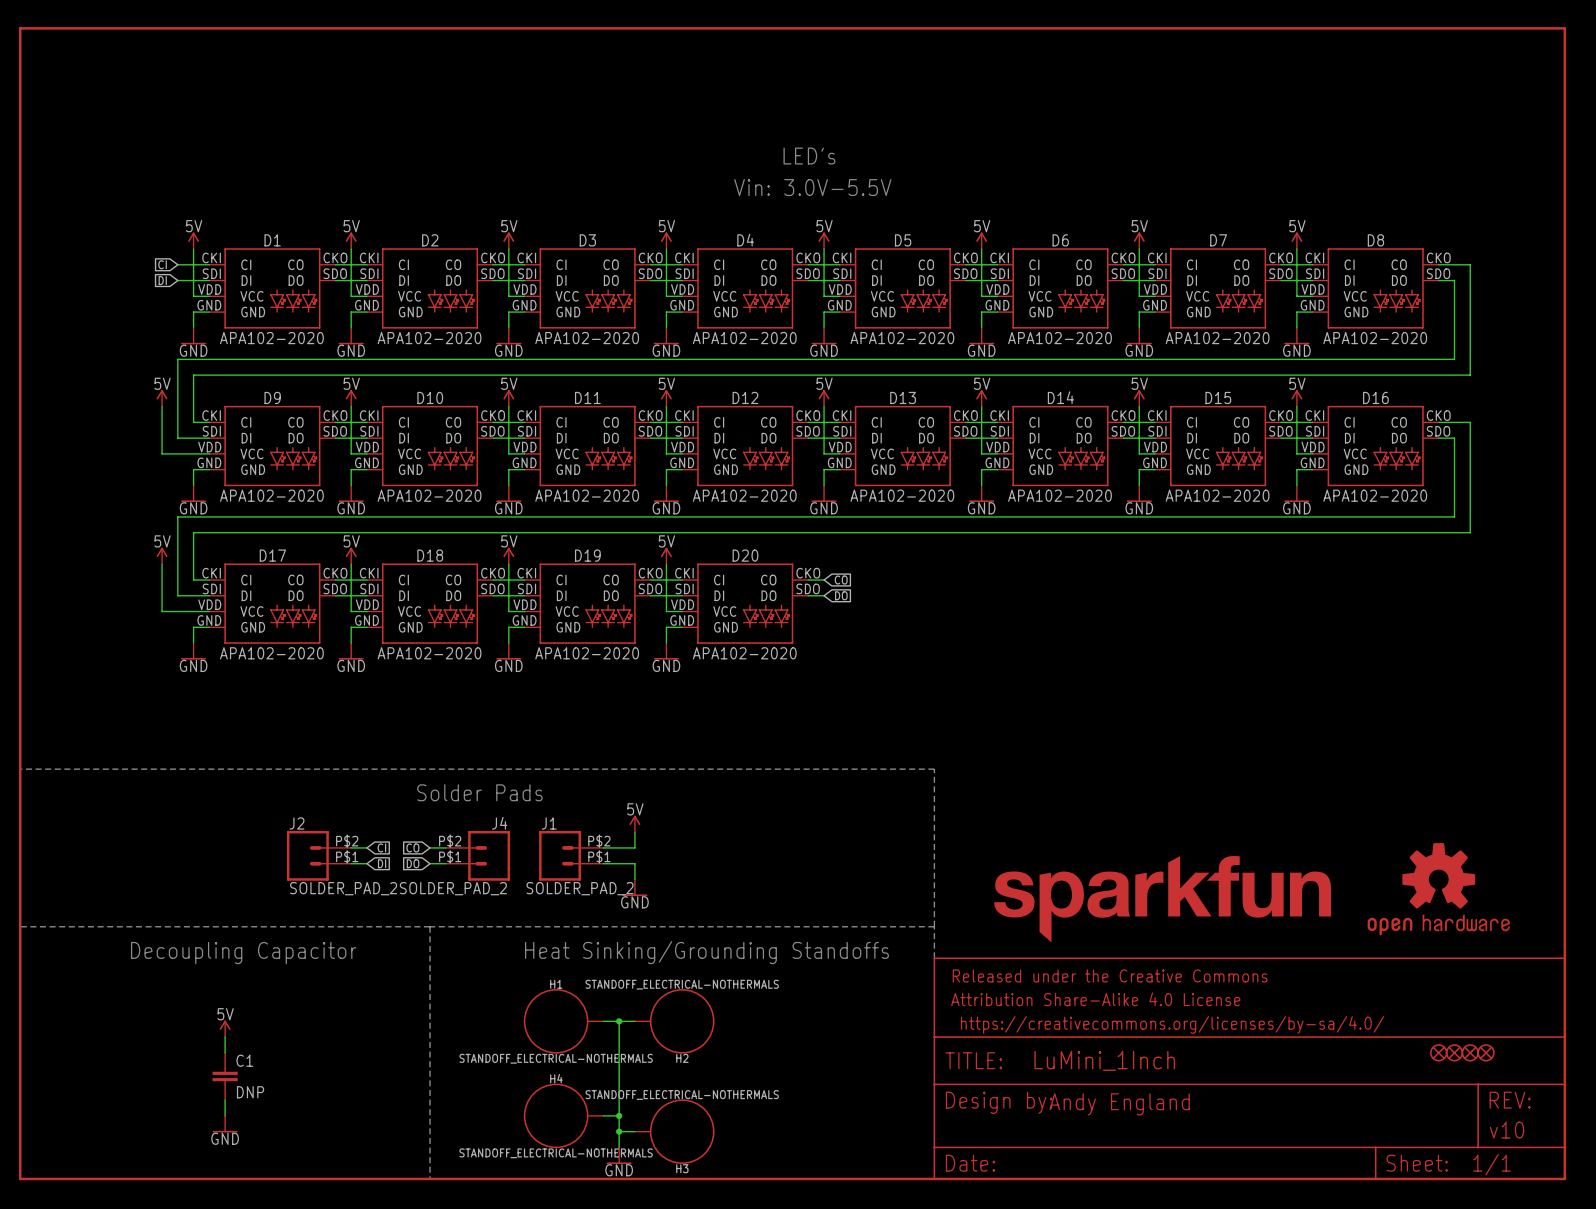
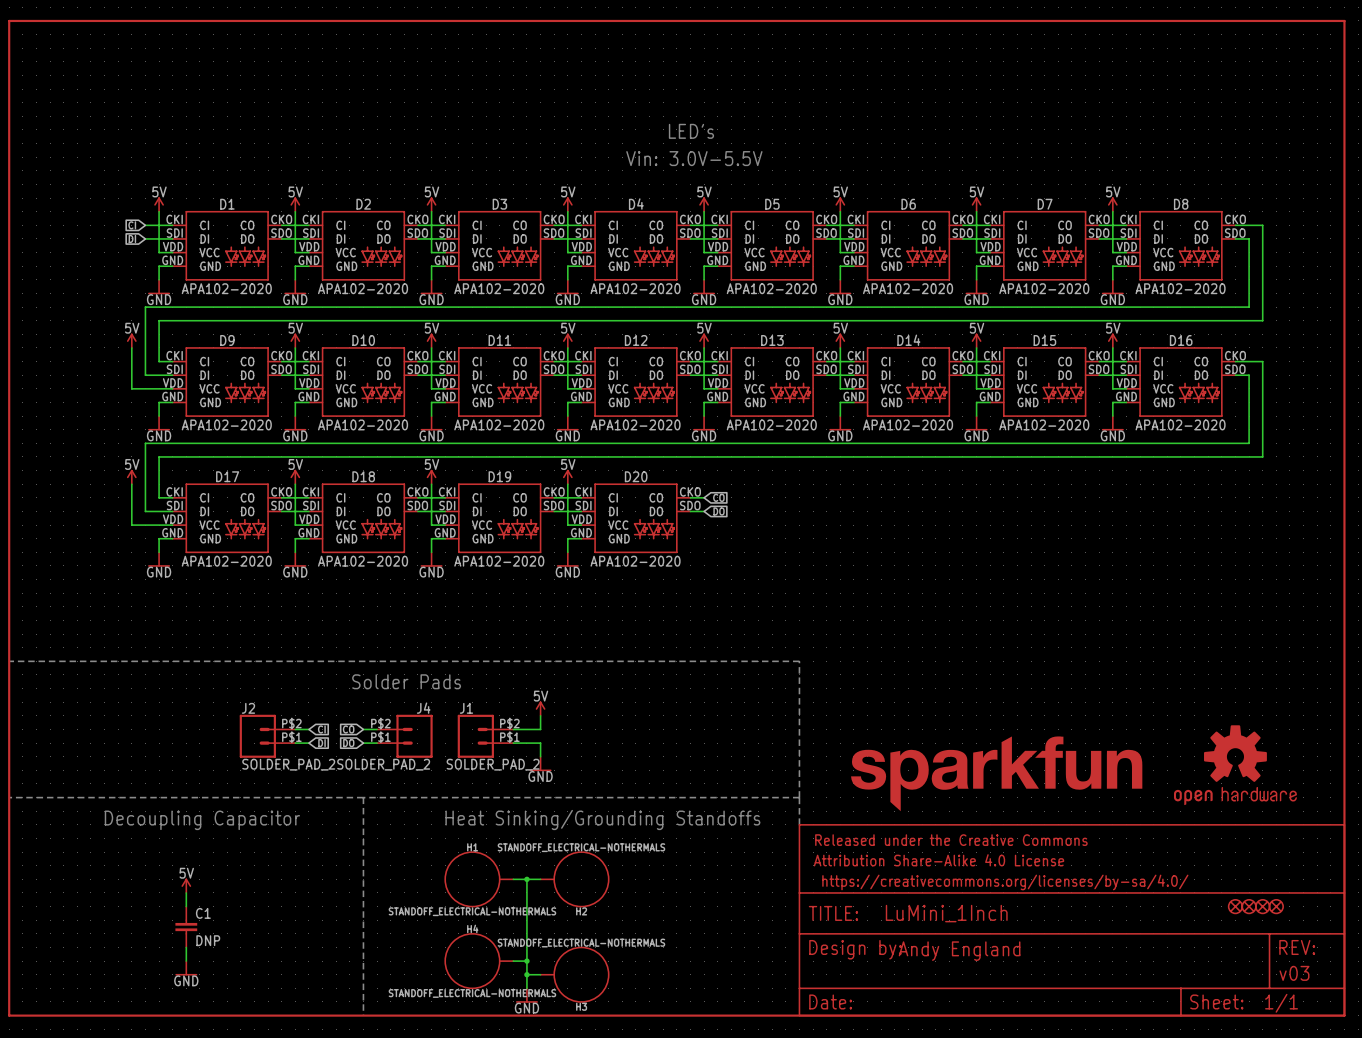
text: v10 (1507, 1130) -> v03 (1294, 973)

